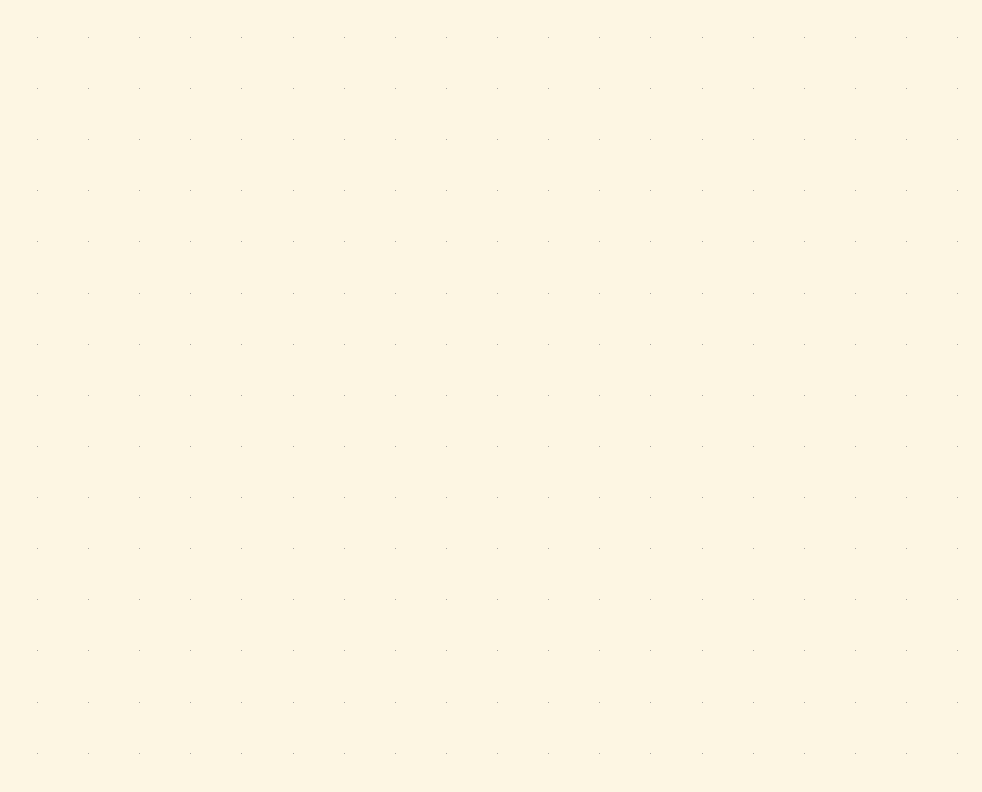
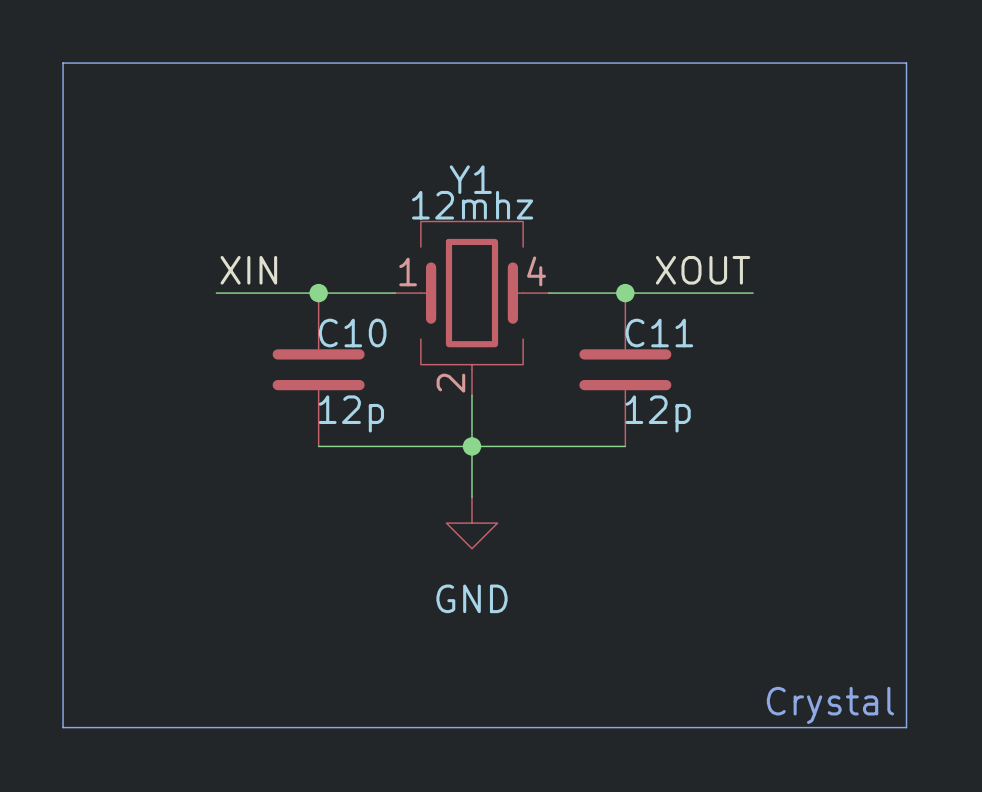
line: none -> (63, 63) (906, 63) (906, 727) (63, 727) (63, 63)
label: none -> XIN (248, 270)
label: none -> XOUT (703, 270)
wire: none -> (216, 293) (395, 293)
junction: none -> (318, 293)
wire: none -> (548, 293) (753, 293)
junction: none -> (625, 293)
Y1: none -> 12mhz (472, 308)
C10: none -> 12p (318, 369)
C11: none -> 12p (625, 369)
wire: none -> (472, 395) (472, 497)
wire: none -> (318, 446) (625, 446)
junction: none -> (472, 446)
power symbol: none -> GND (472, 523)
text: none -> Crystal (830, 705)

